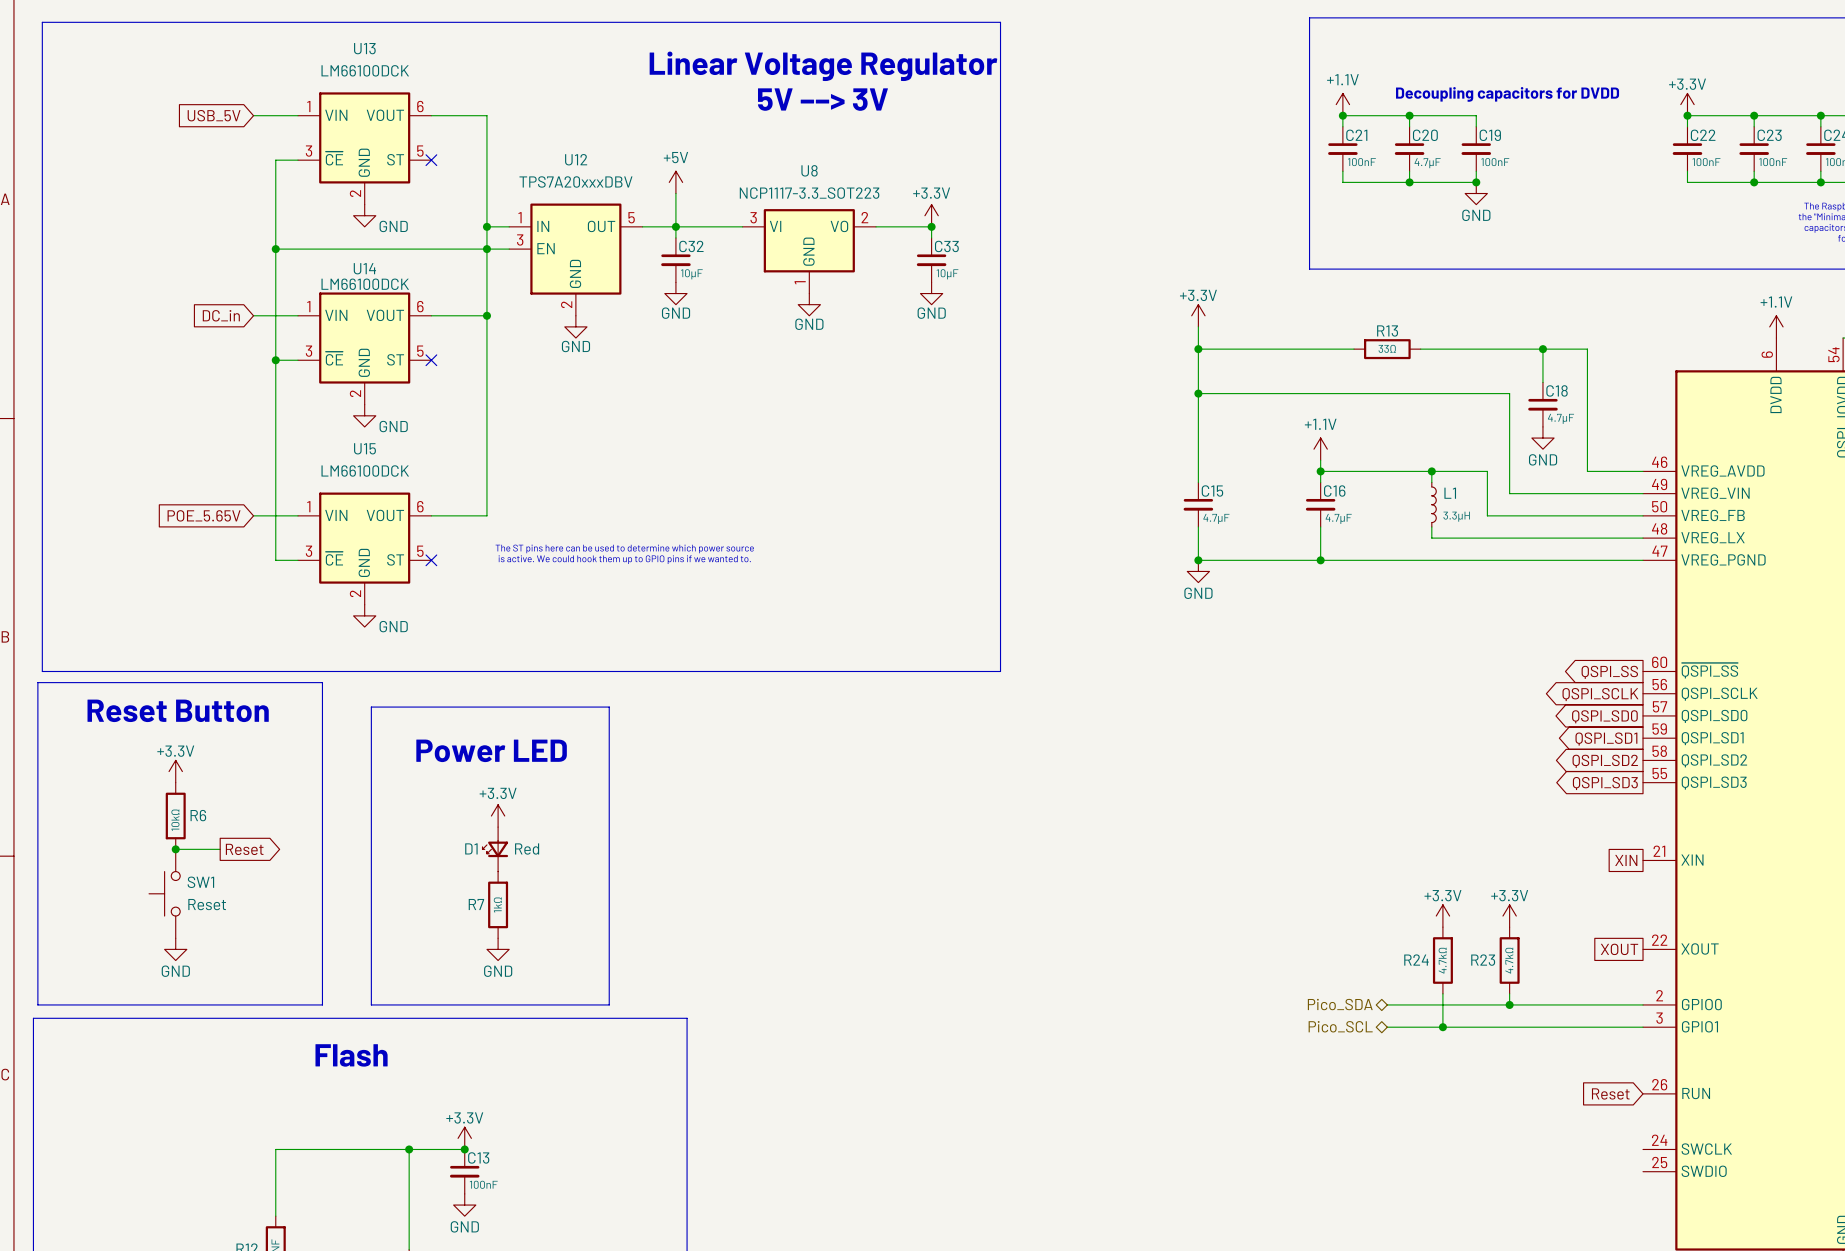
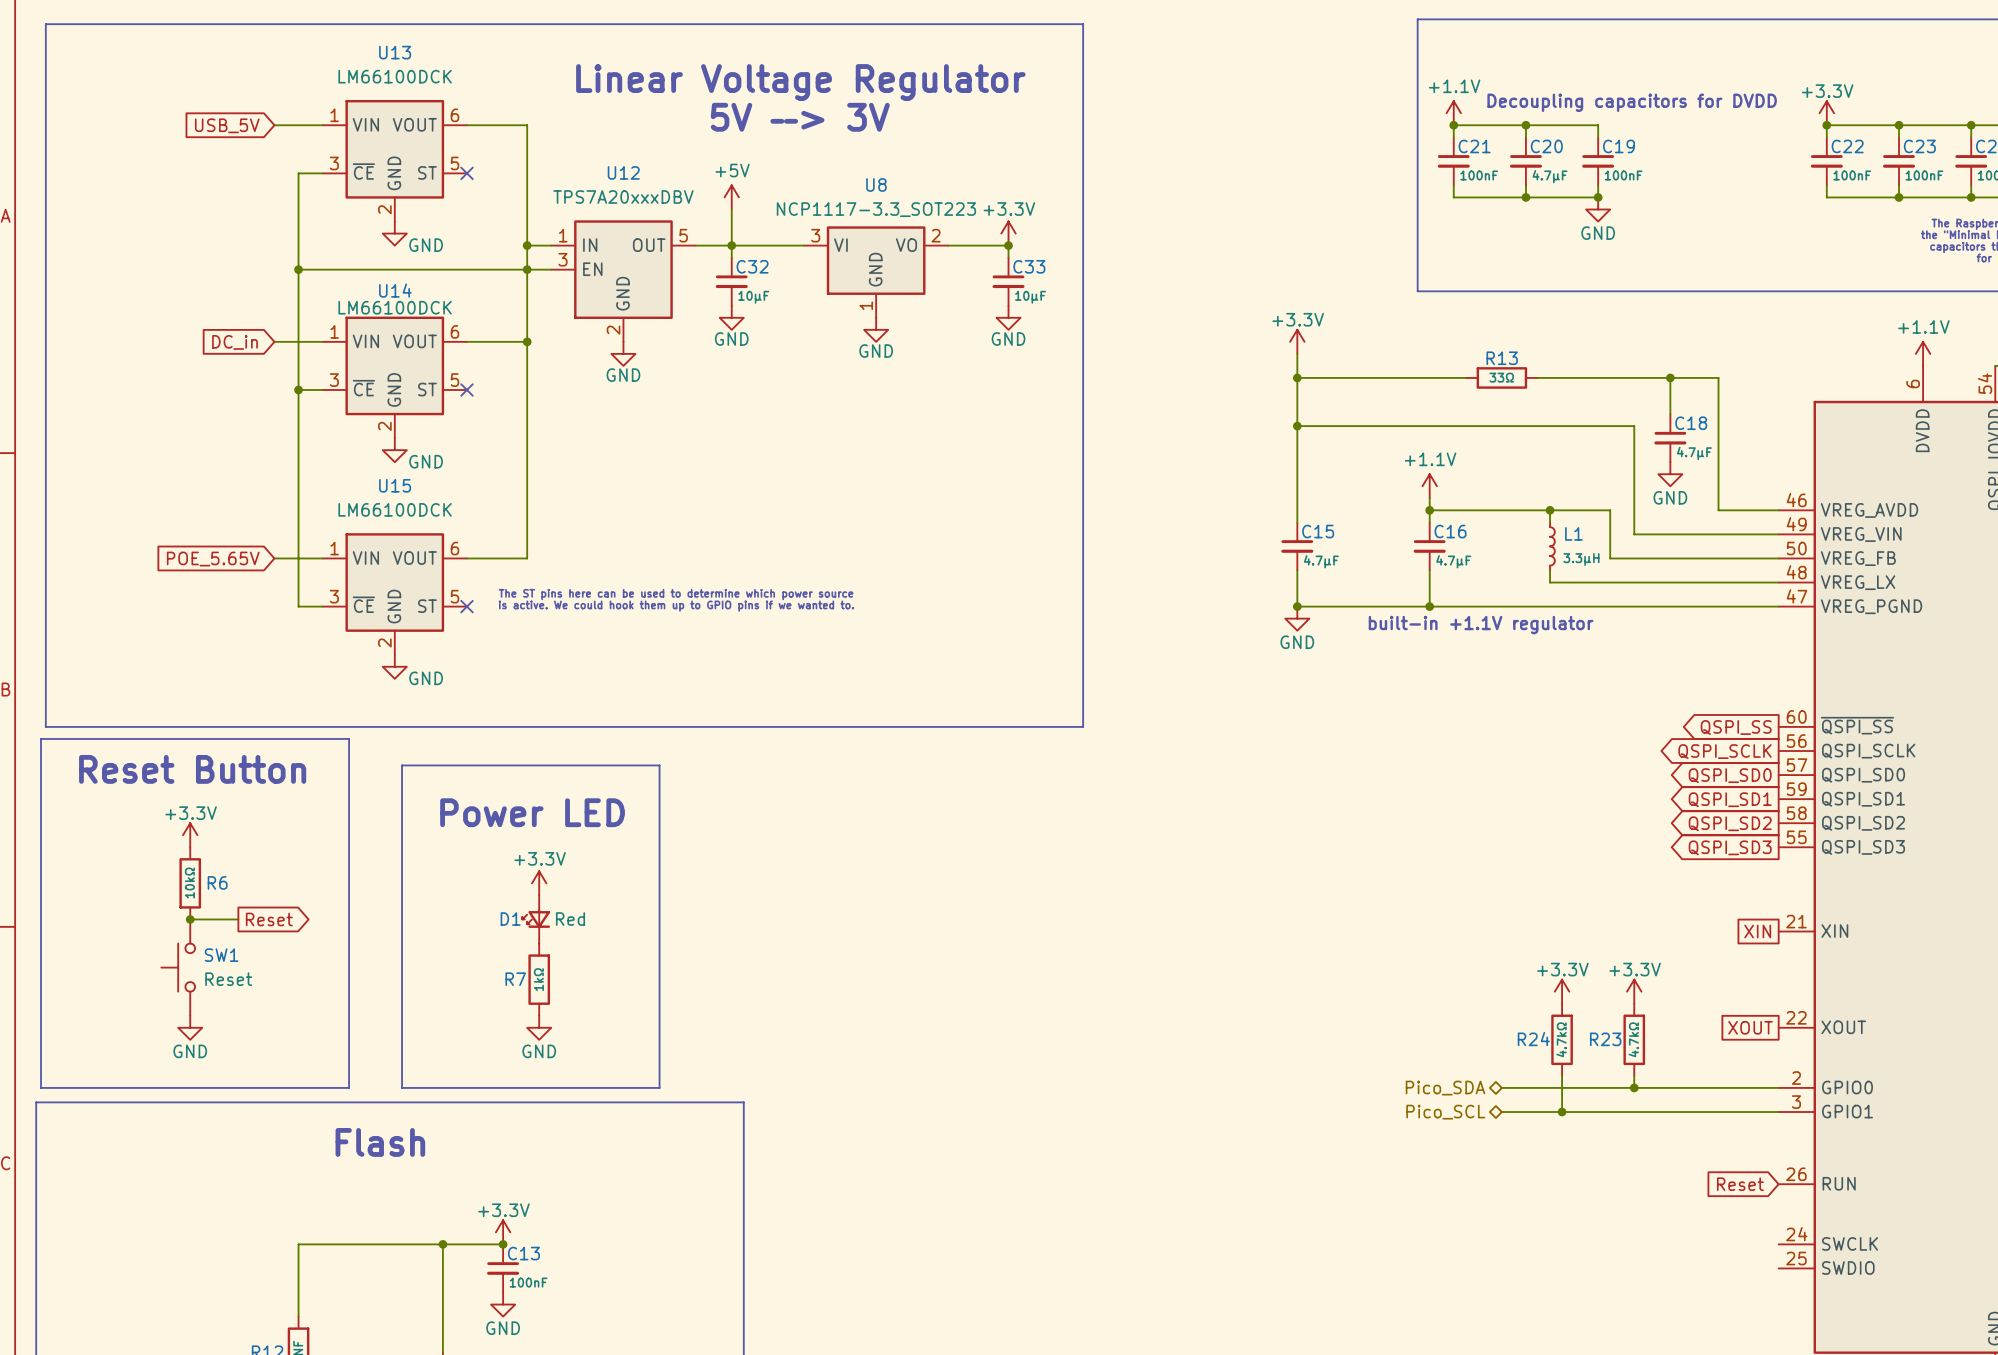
text position: Linear Voltage Regulator (823, 66) -> Linear Voltage Regulator (800, 82)
text position: 5V ––> 3V (822, 99) -> 5V ––> 3V (800, 117)
text: none -> built-in +1.1V regulator (1481, 625)

